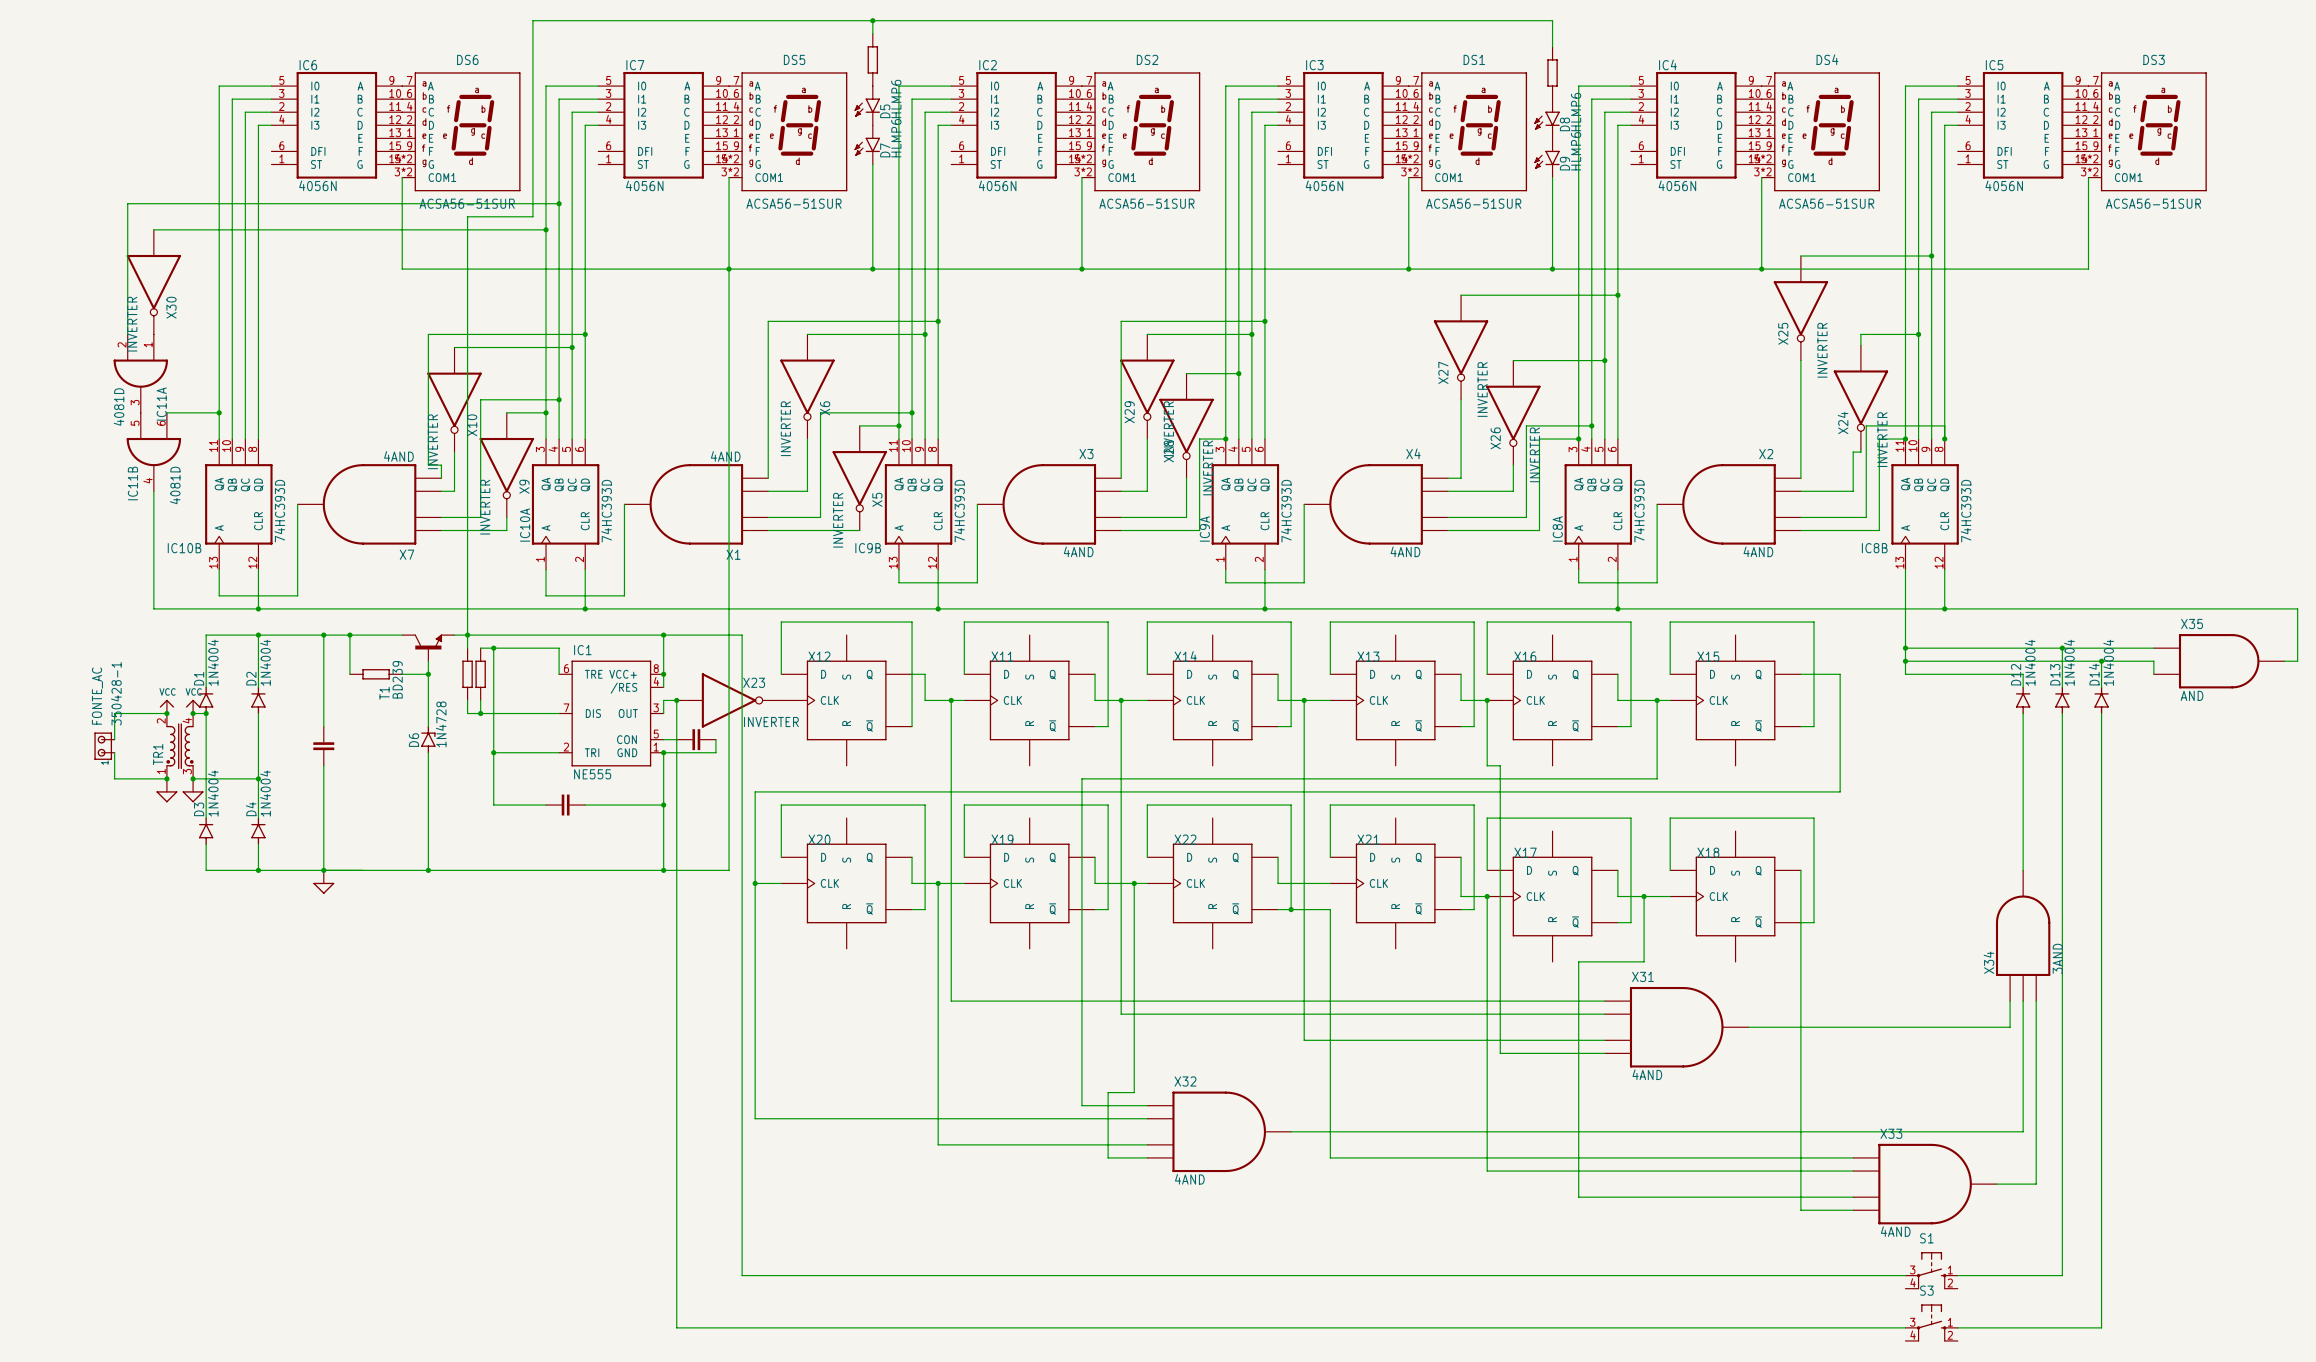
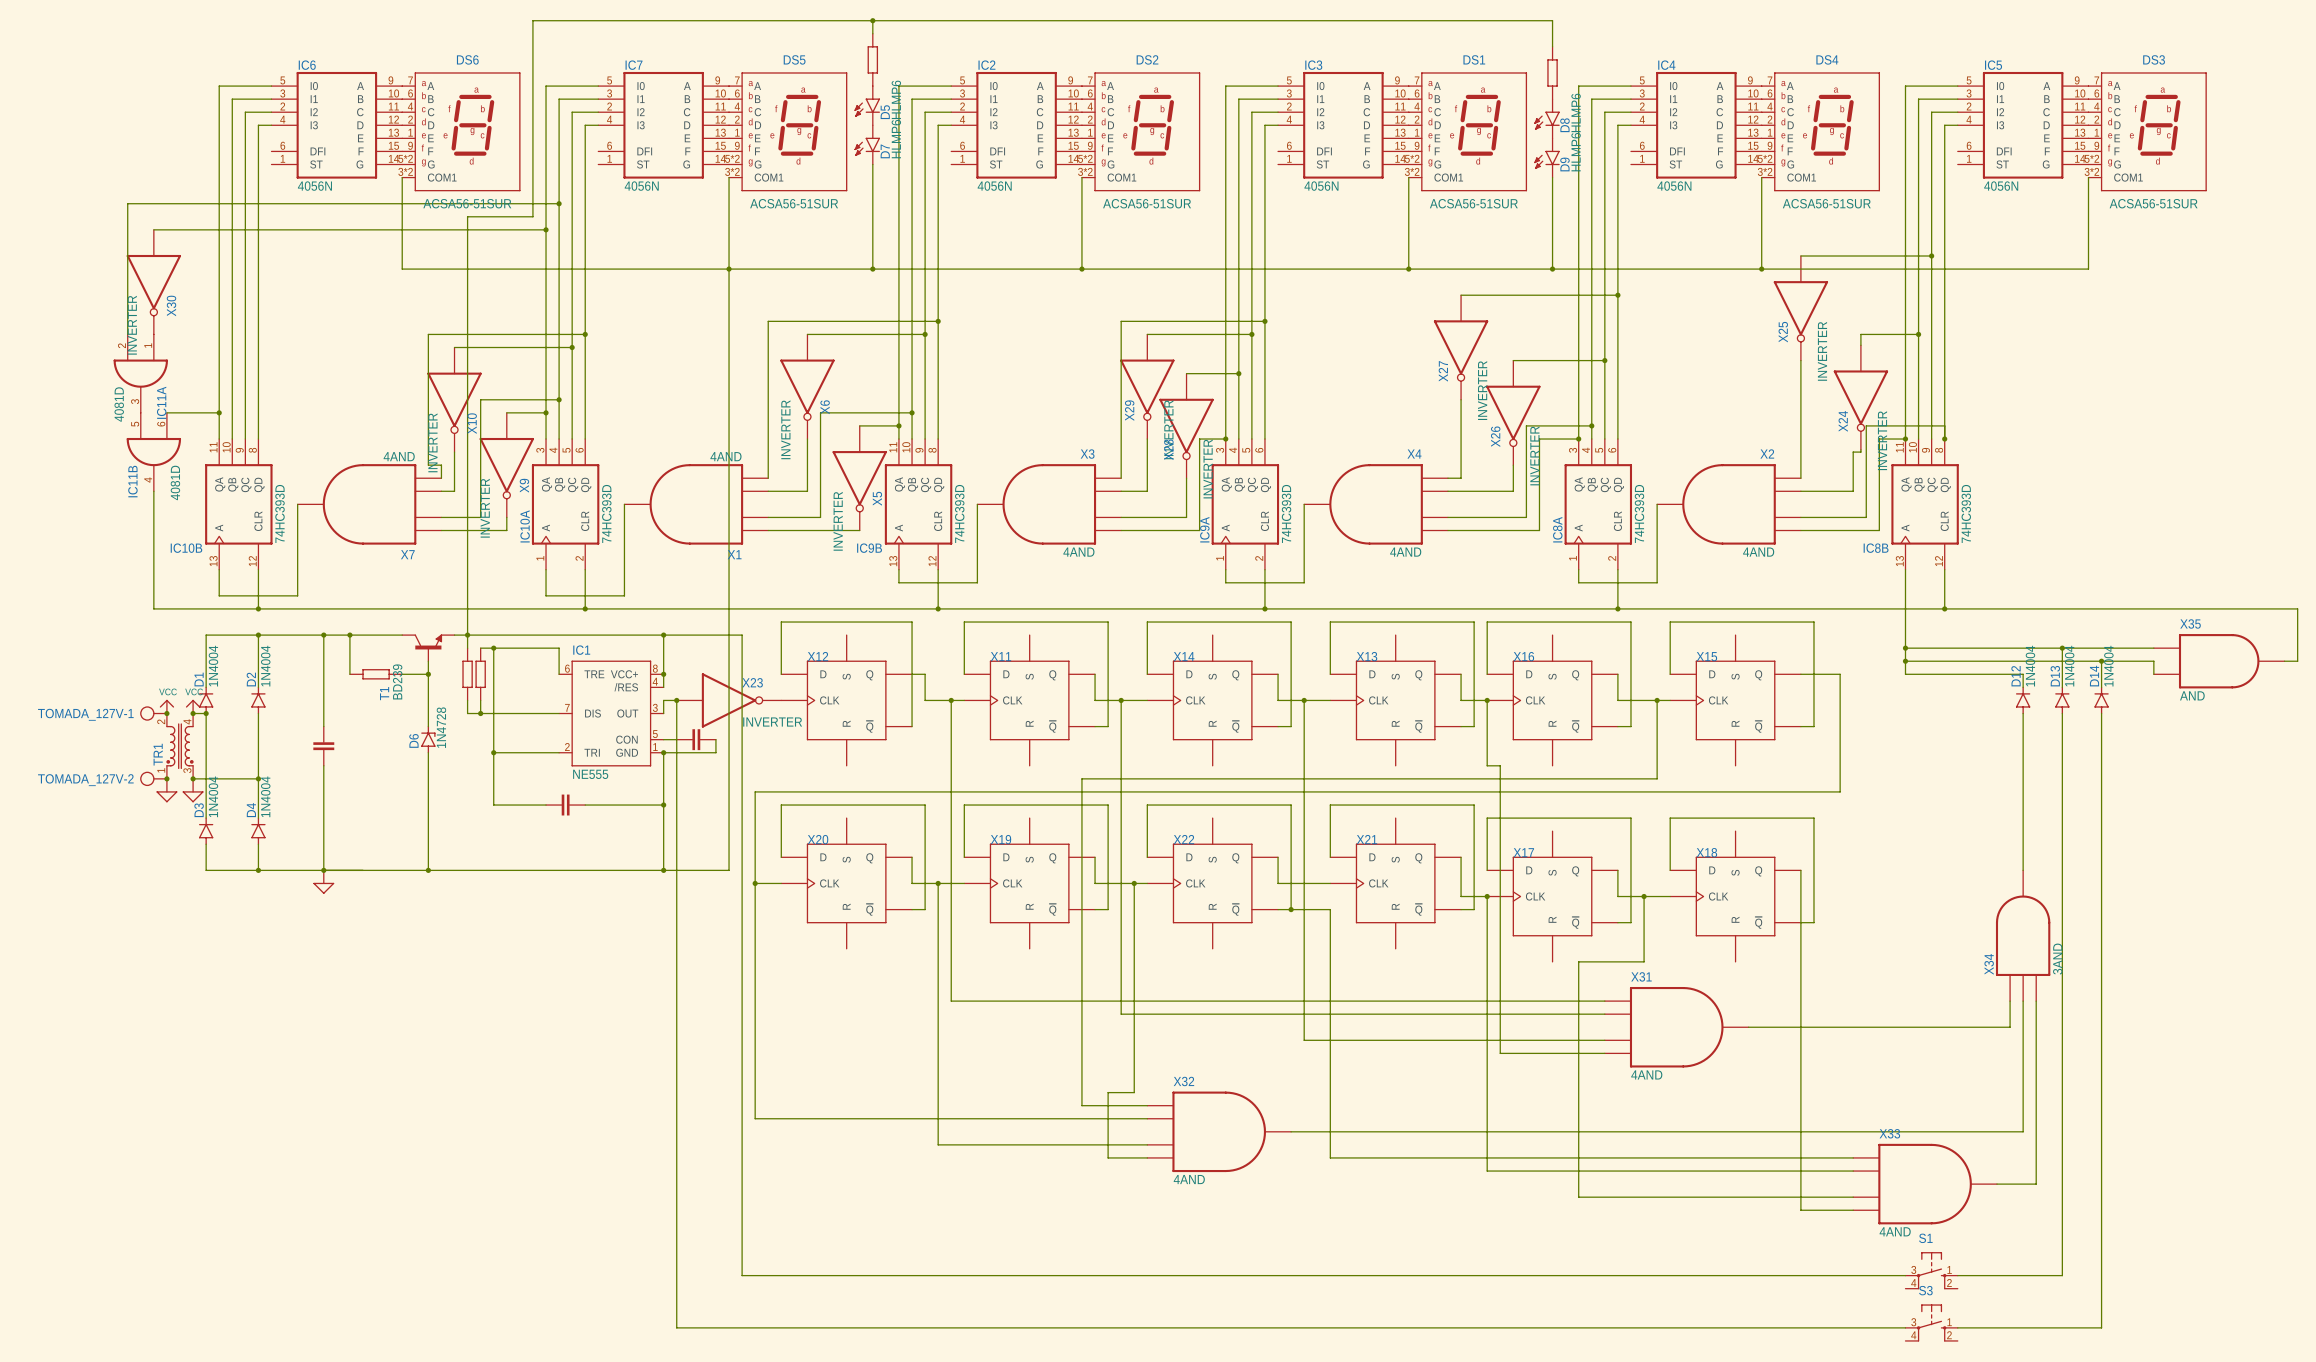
TOMADA_127V-1: none -> (153, 713)
wire: (166, 713) (114, 713) (114, 739) -> none
FONTE_AC: 350428-1 (104, 746) -> none
wire: (114, 752) (114, 778) (166, 778) -> none
TOMADA_127V-2: none -> (153, 778)

